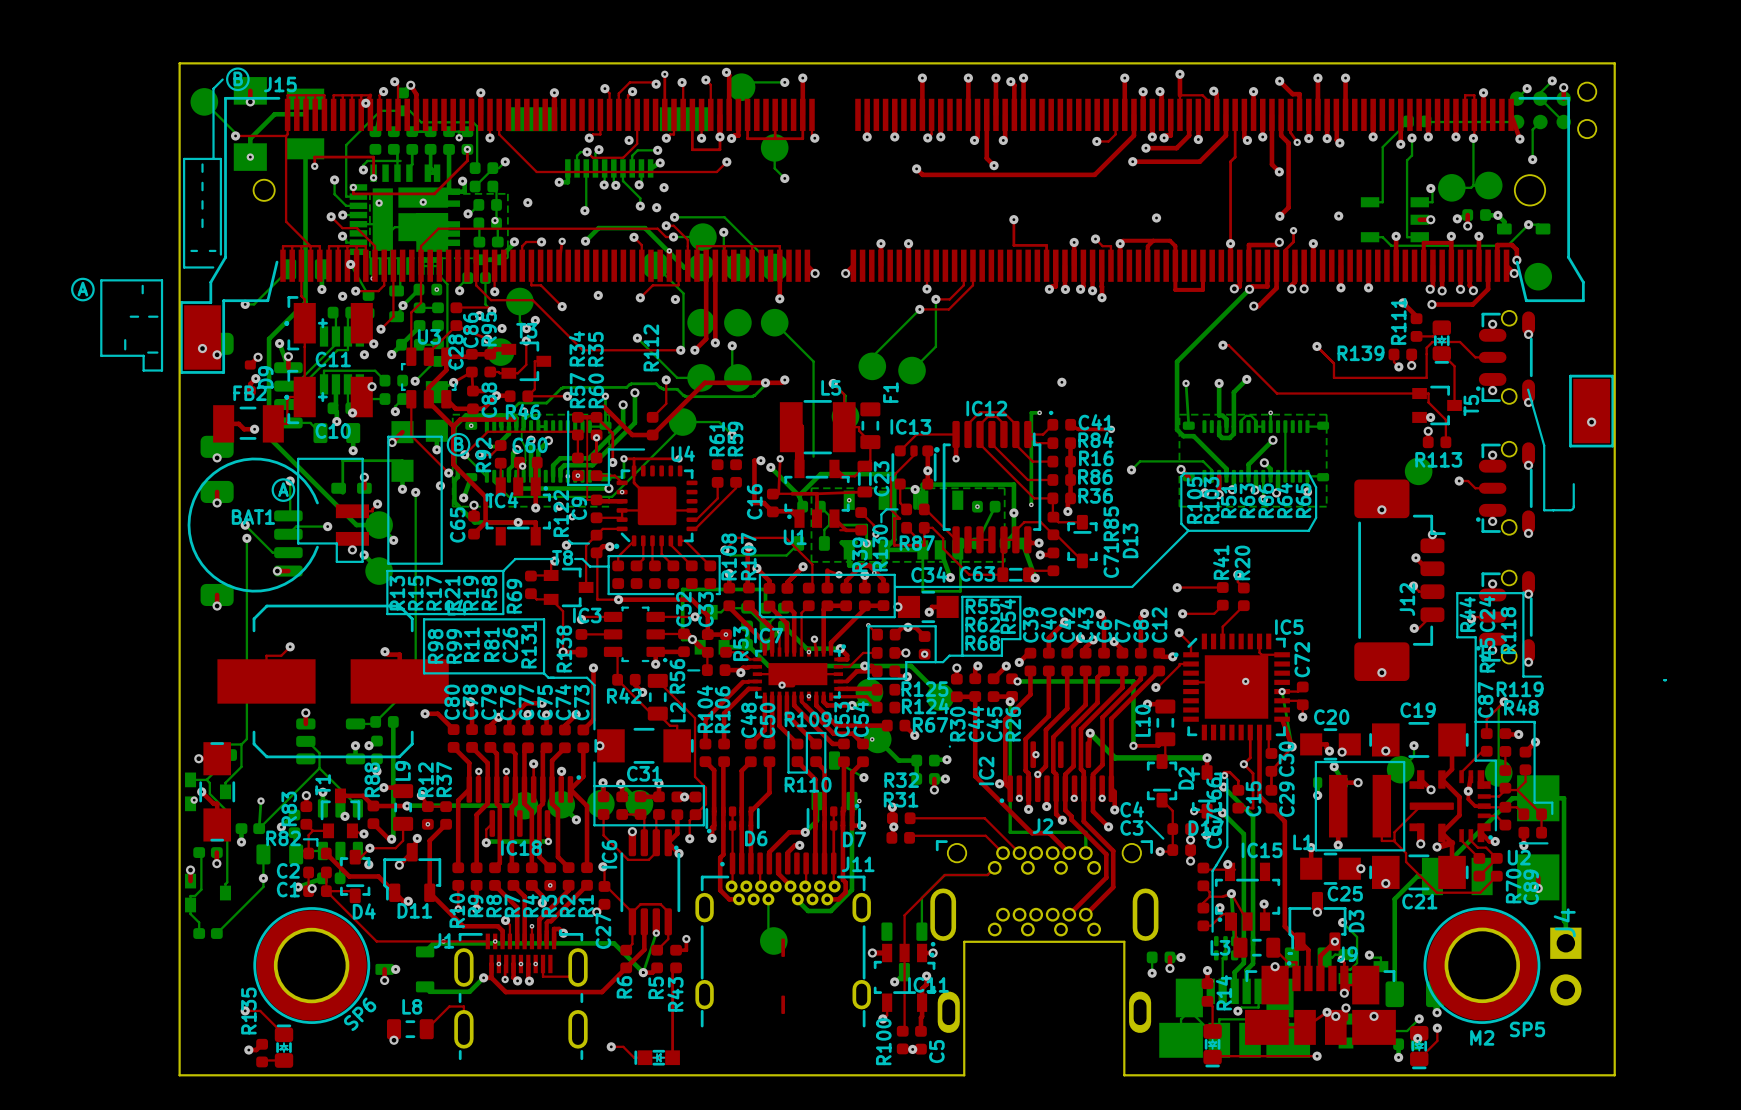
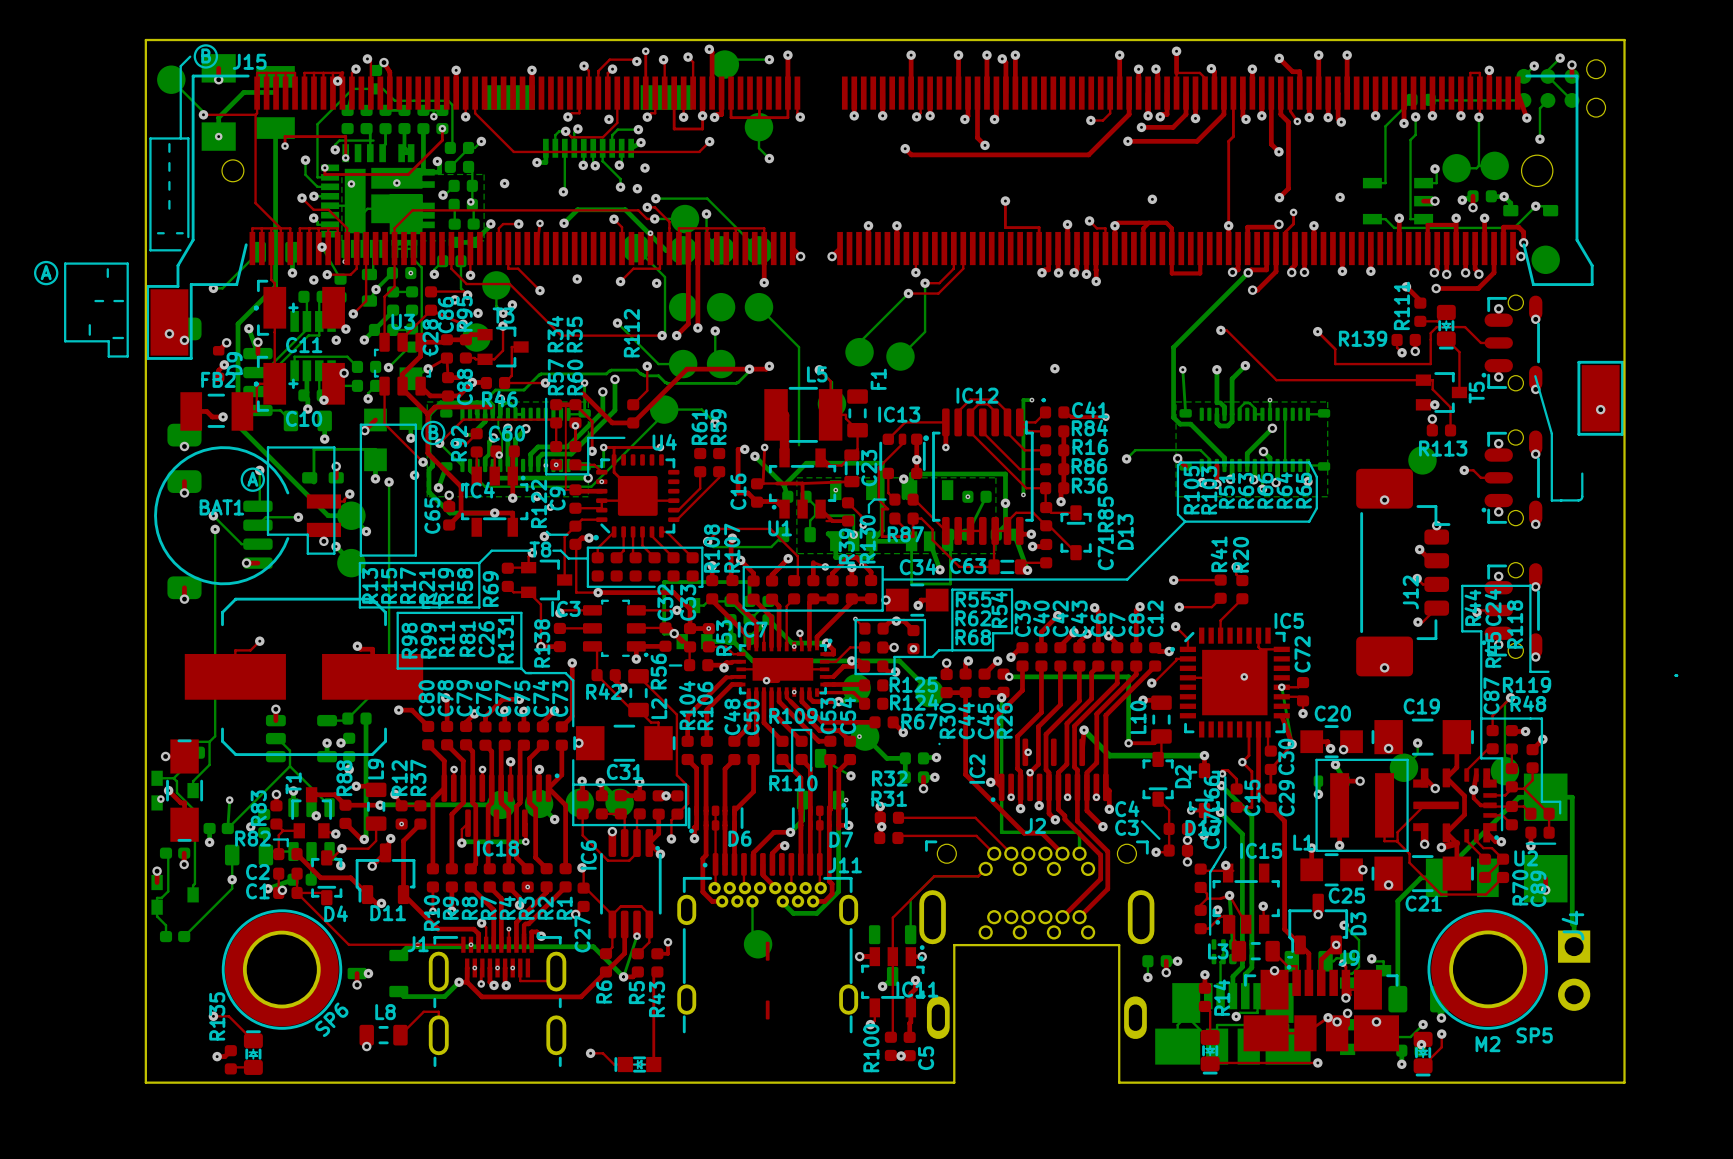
via: (471, 425) -> none

